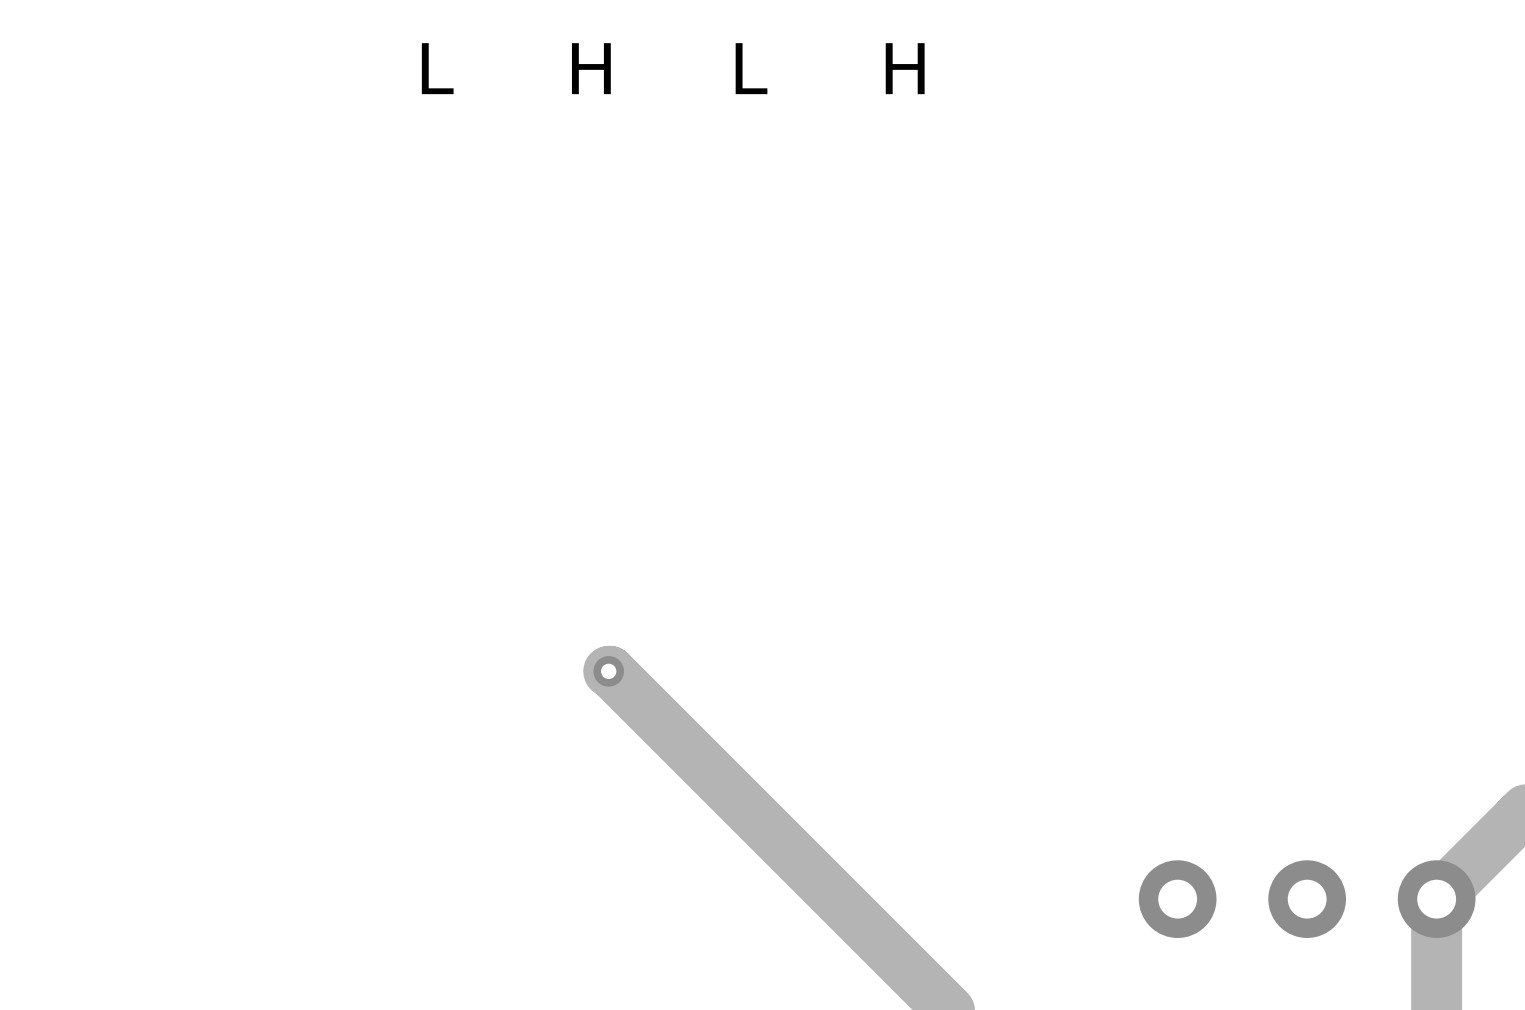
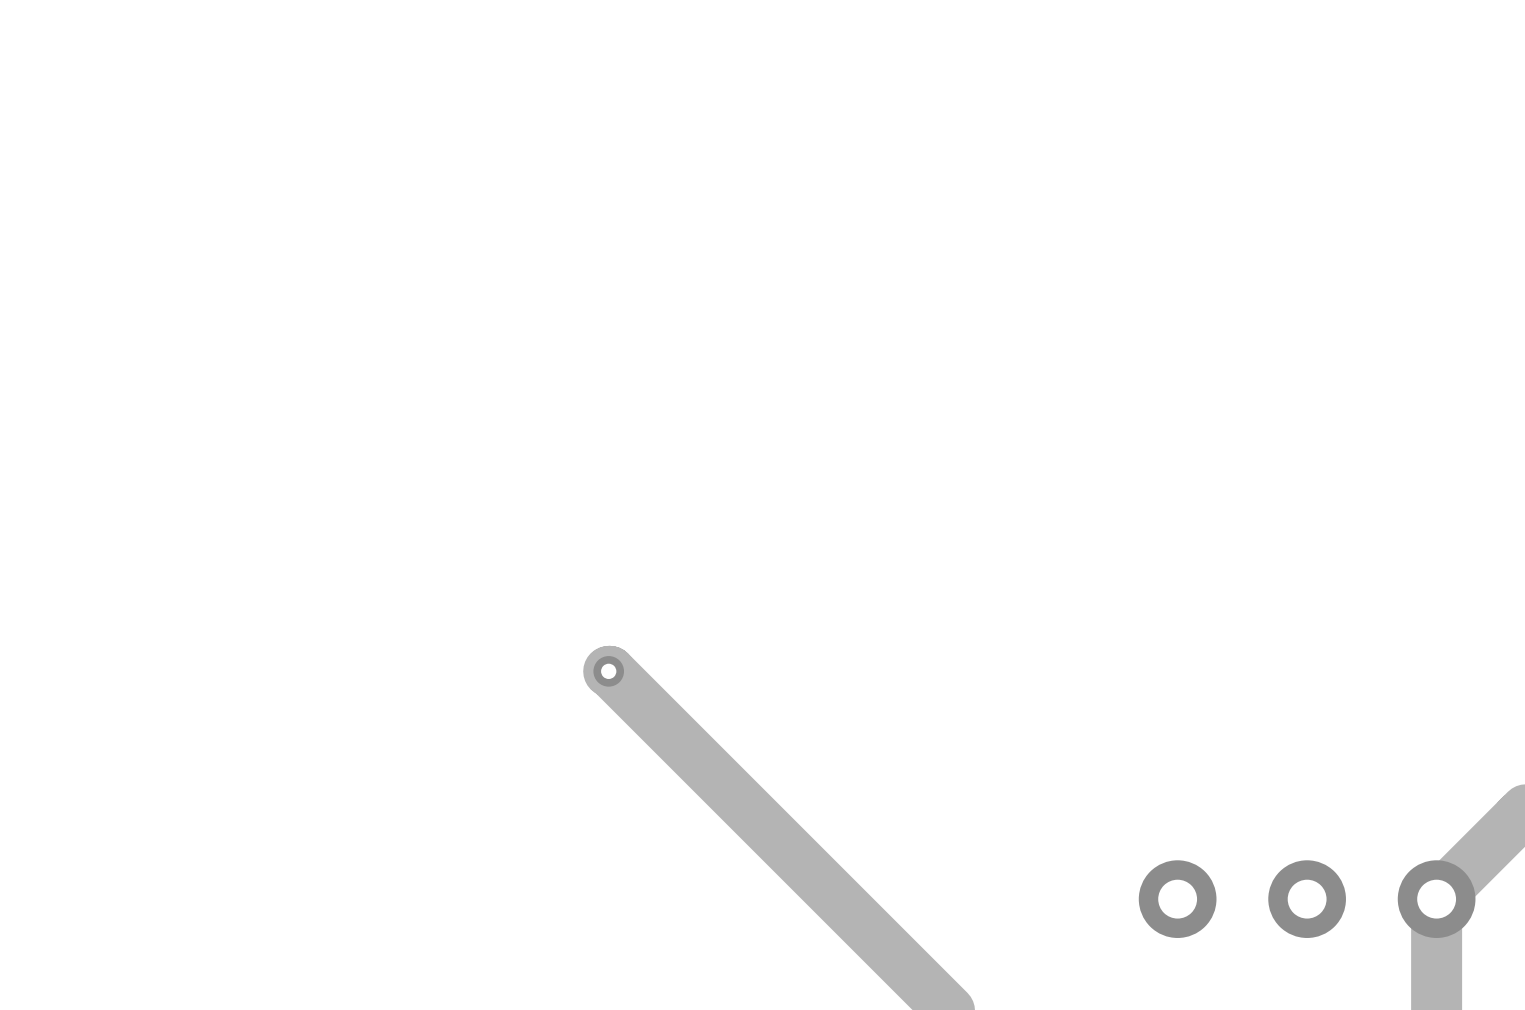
text: L H L H (673, 68) -> none

